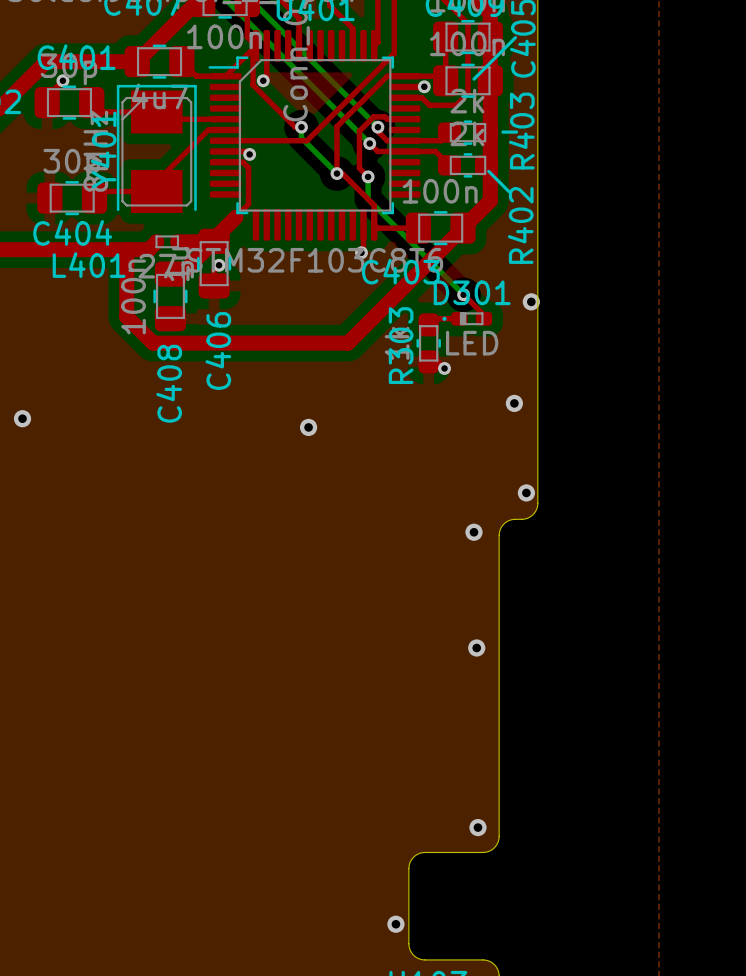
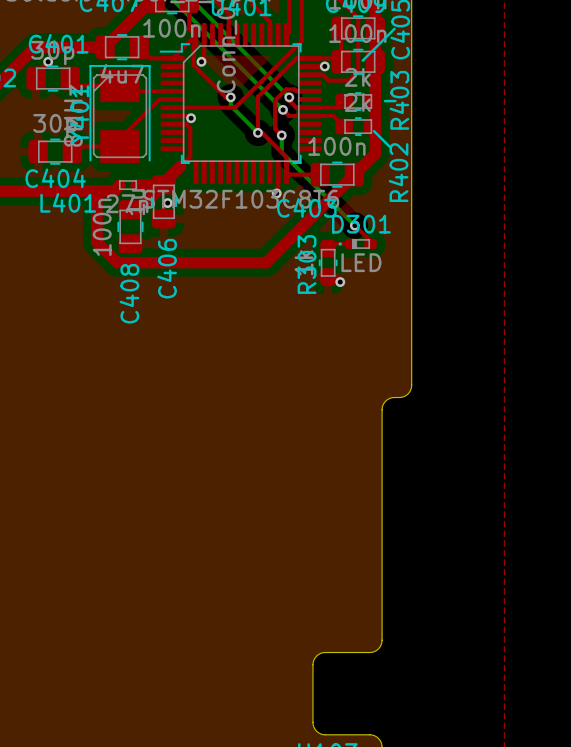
via: (531, 301) -> none
via: (514, 403) -> none
via: (22, 418) -> none
via: (308, 427) -> none
via: (526, 492) -> none
via: (474, 532) -> none
via: (476, 647) -> none
via: (477, 827) -> none
via: (395, 924) -> none

